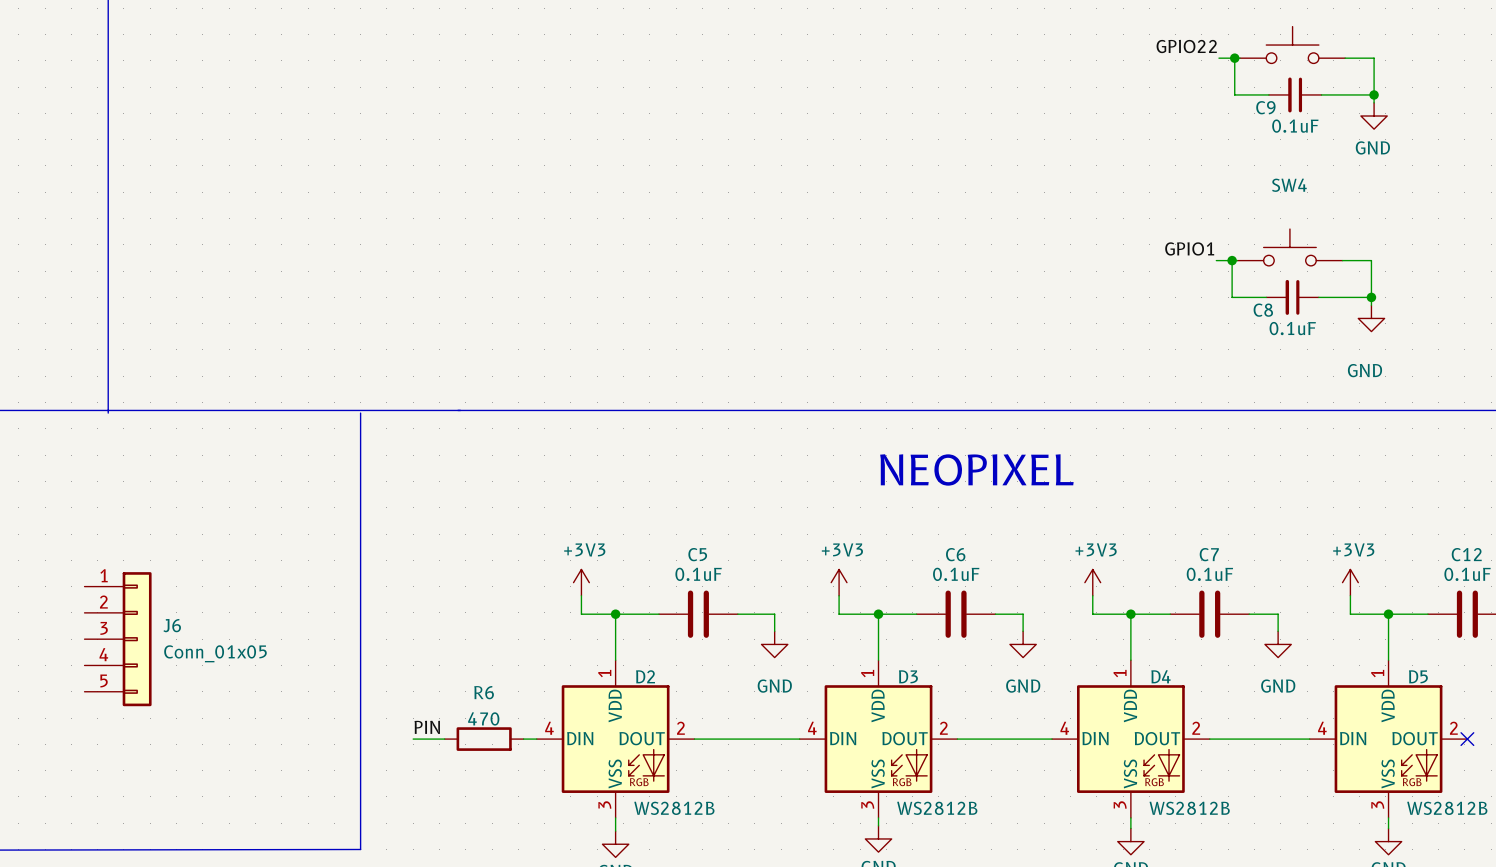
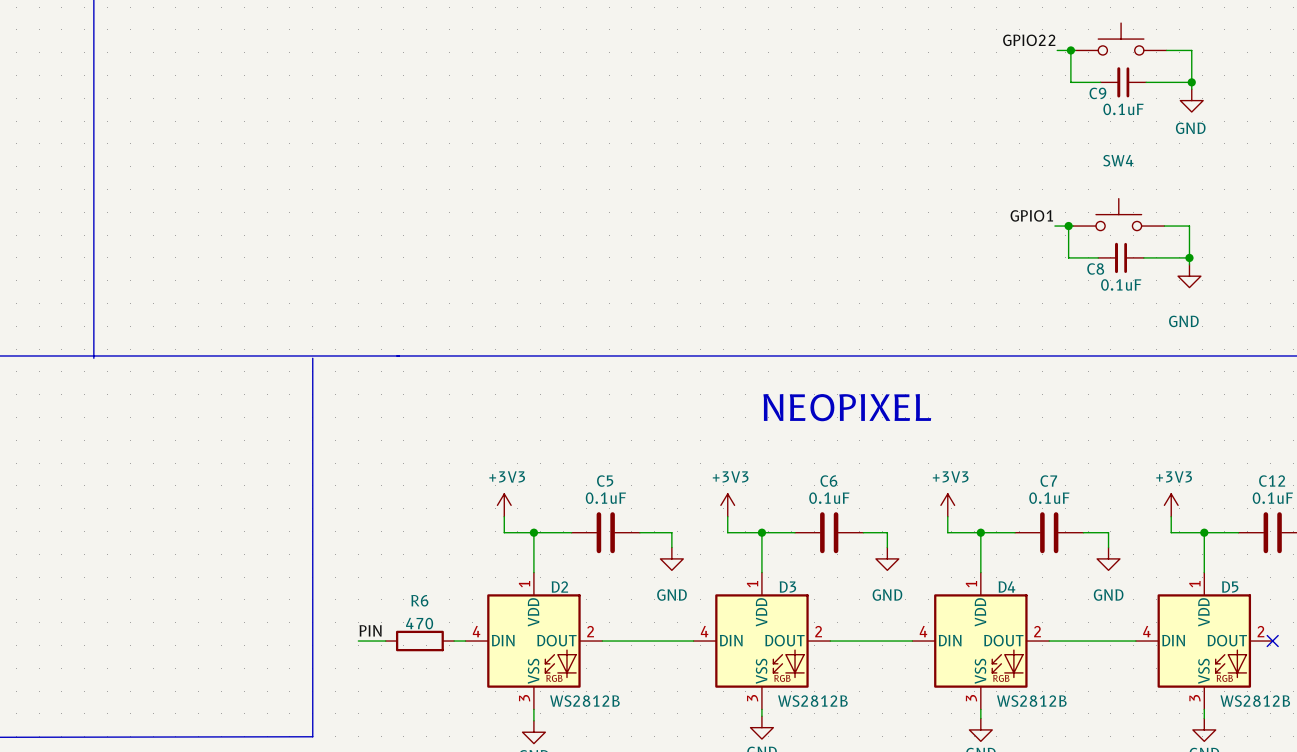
J6: Conn_01x05 (118, 639) -> none

